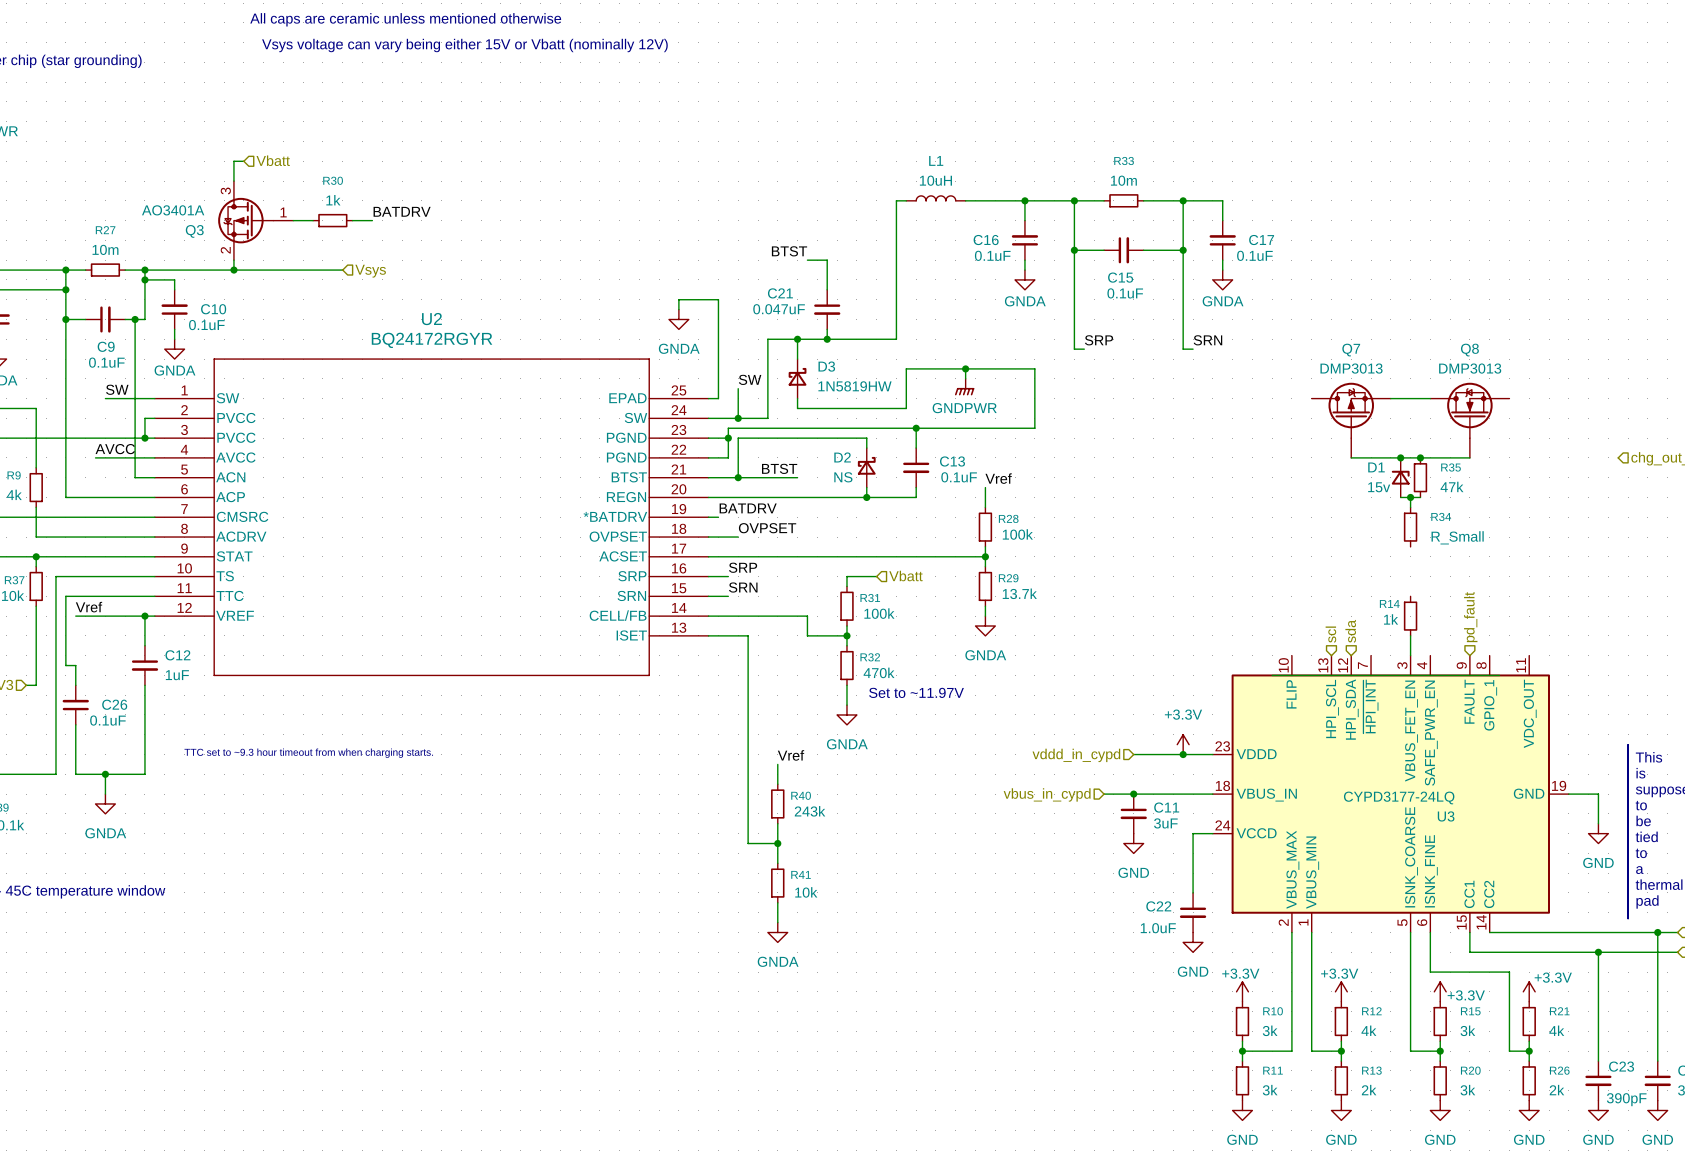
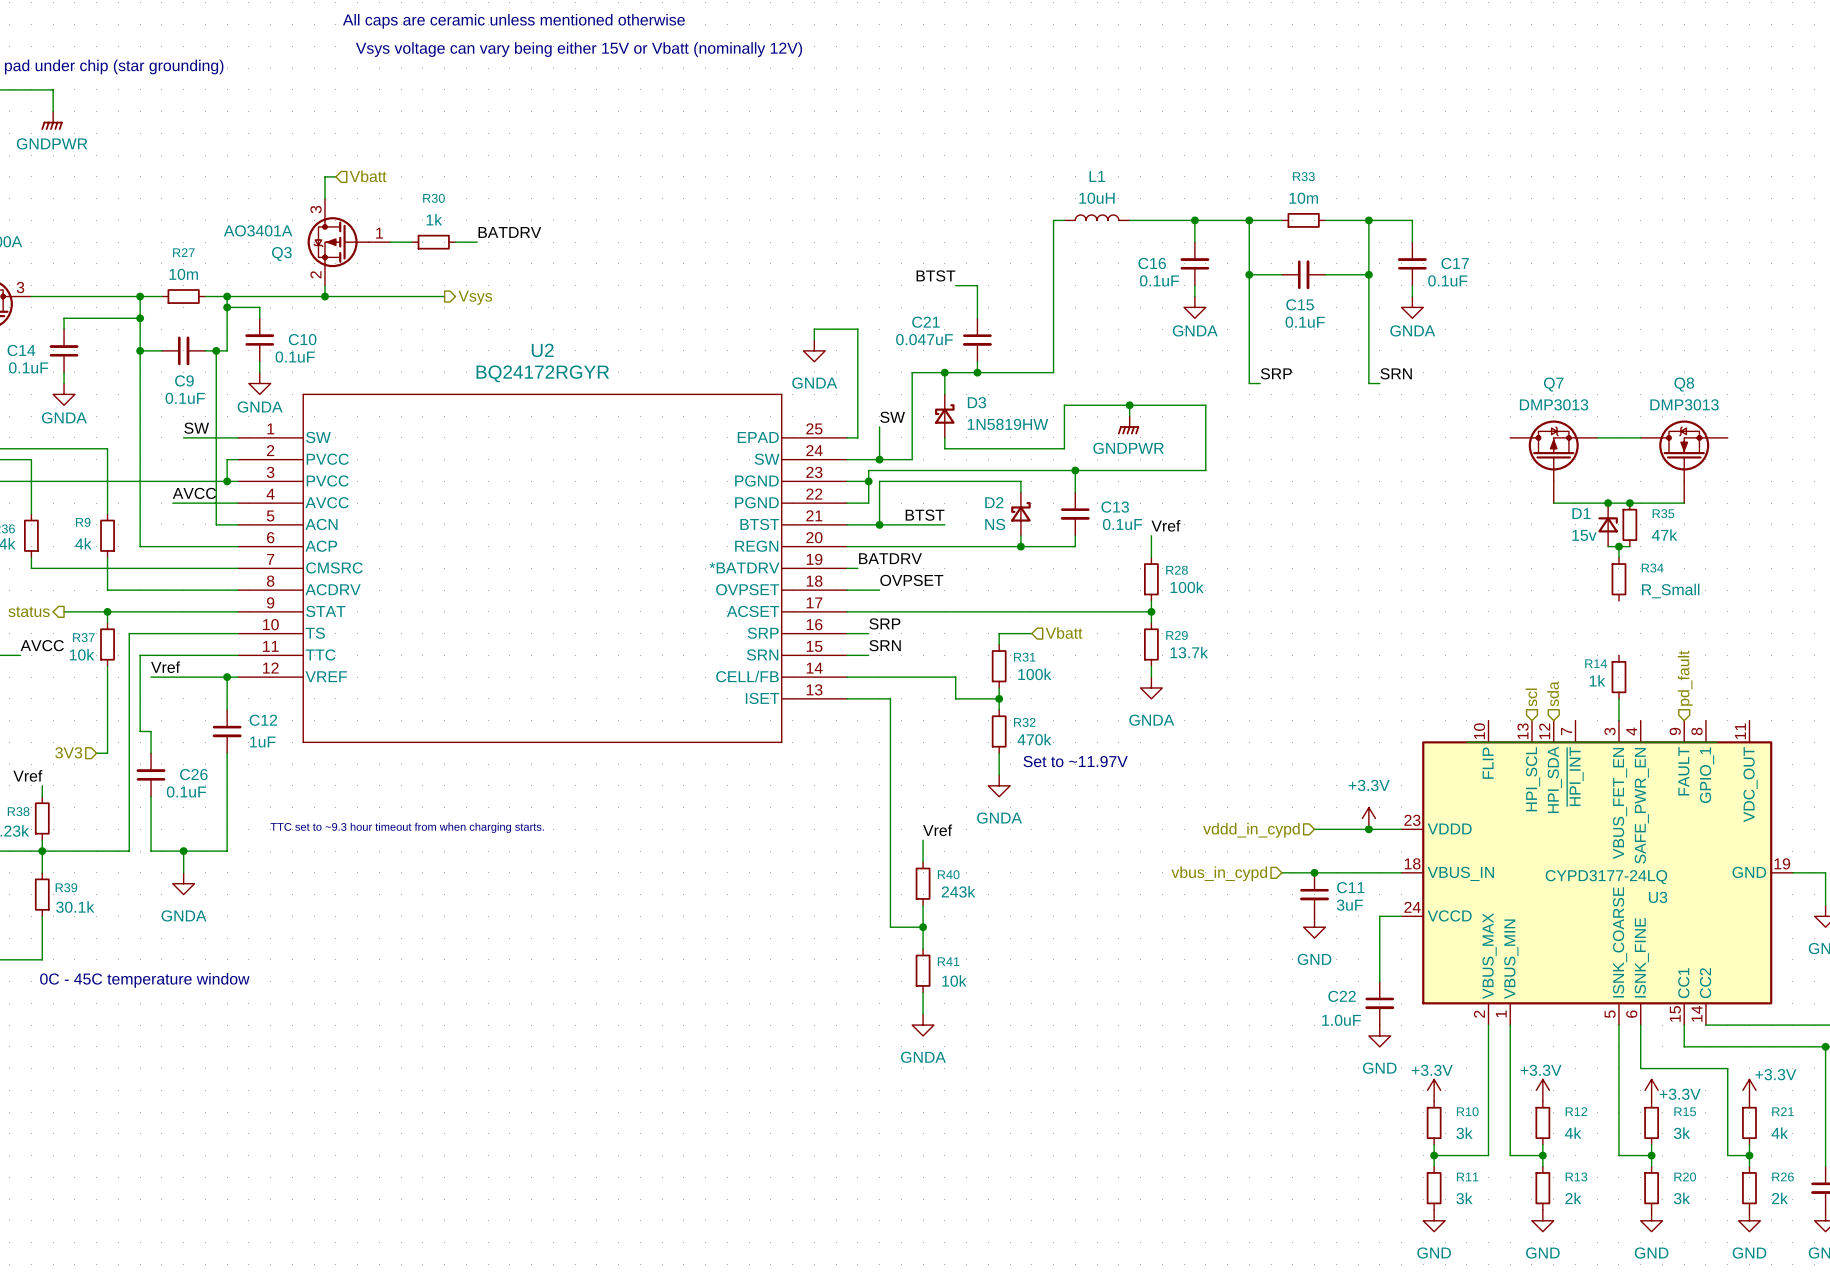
hierarchical label shape: input (370, 271) -> output (475, 297)

